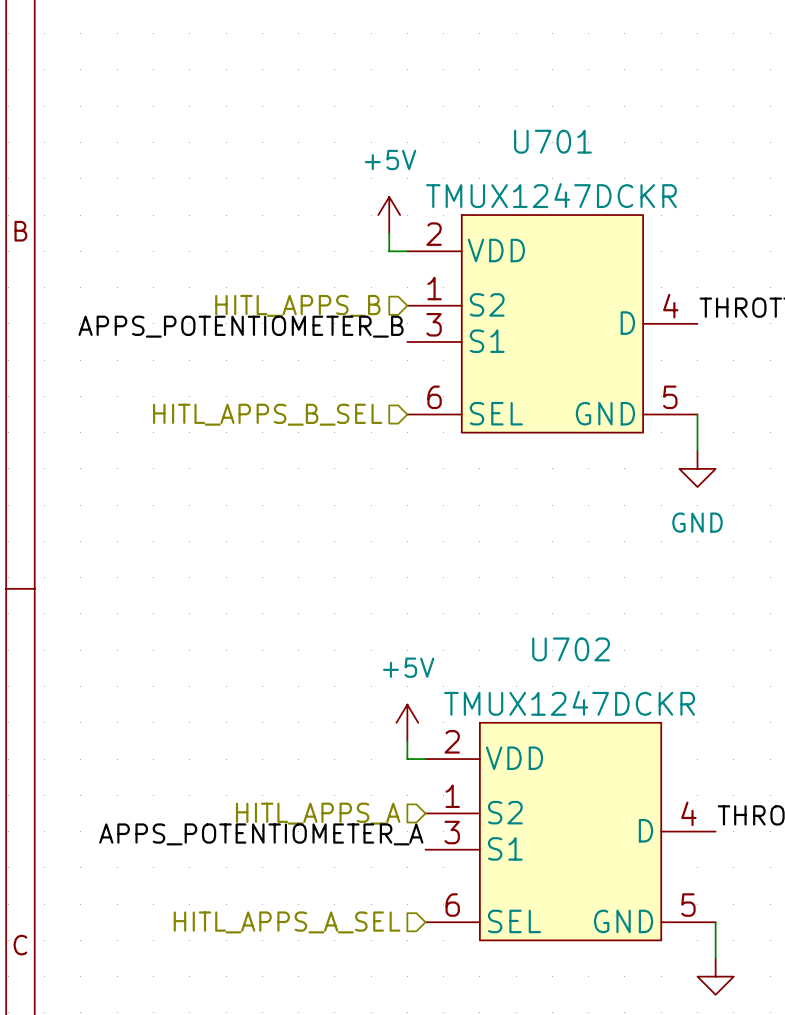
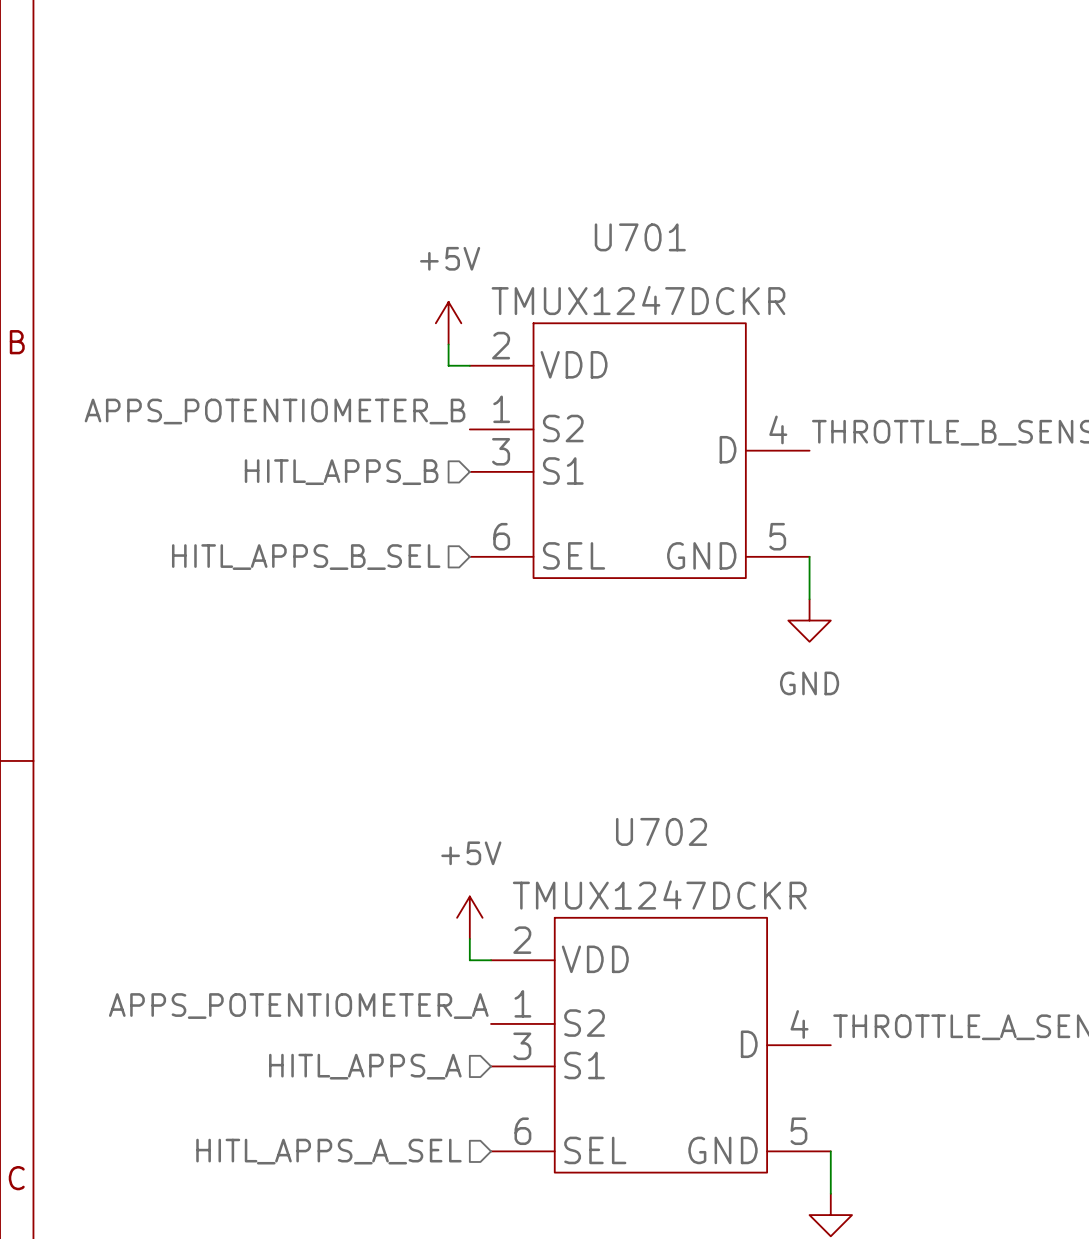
hierarchical label position: HITL_APPS_B (297, 305) -> HITL_APPS_B (341, 472)
label position: APPS_POTENTIOMETER_B (241, 326) -> APPS_POTENTIOMETER_B (275, 411)
hierarchical label position: HITL_APPS_A (318, 813) -> HITL_APPS_A (365, 1066)
label position: APPS_POTENTIOMETER_A (261, 834) -> APPS_POTENTIOMETER_A (298, 1006)

